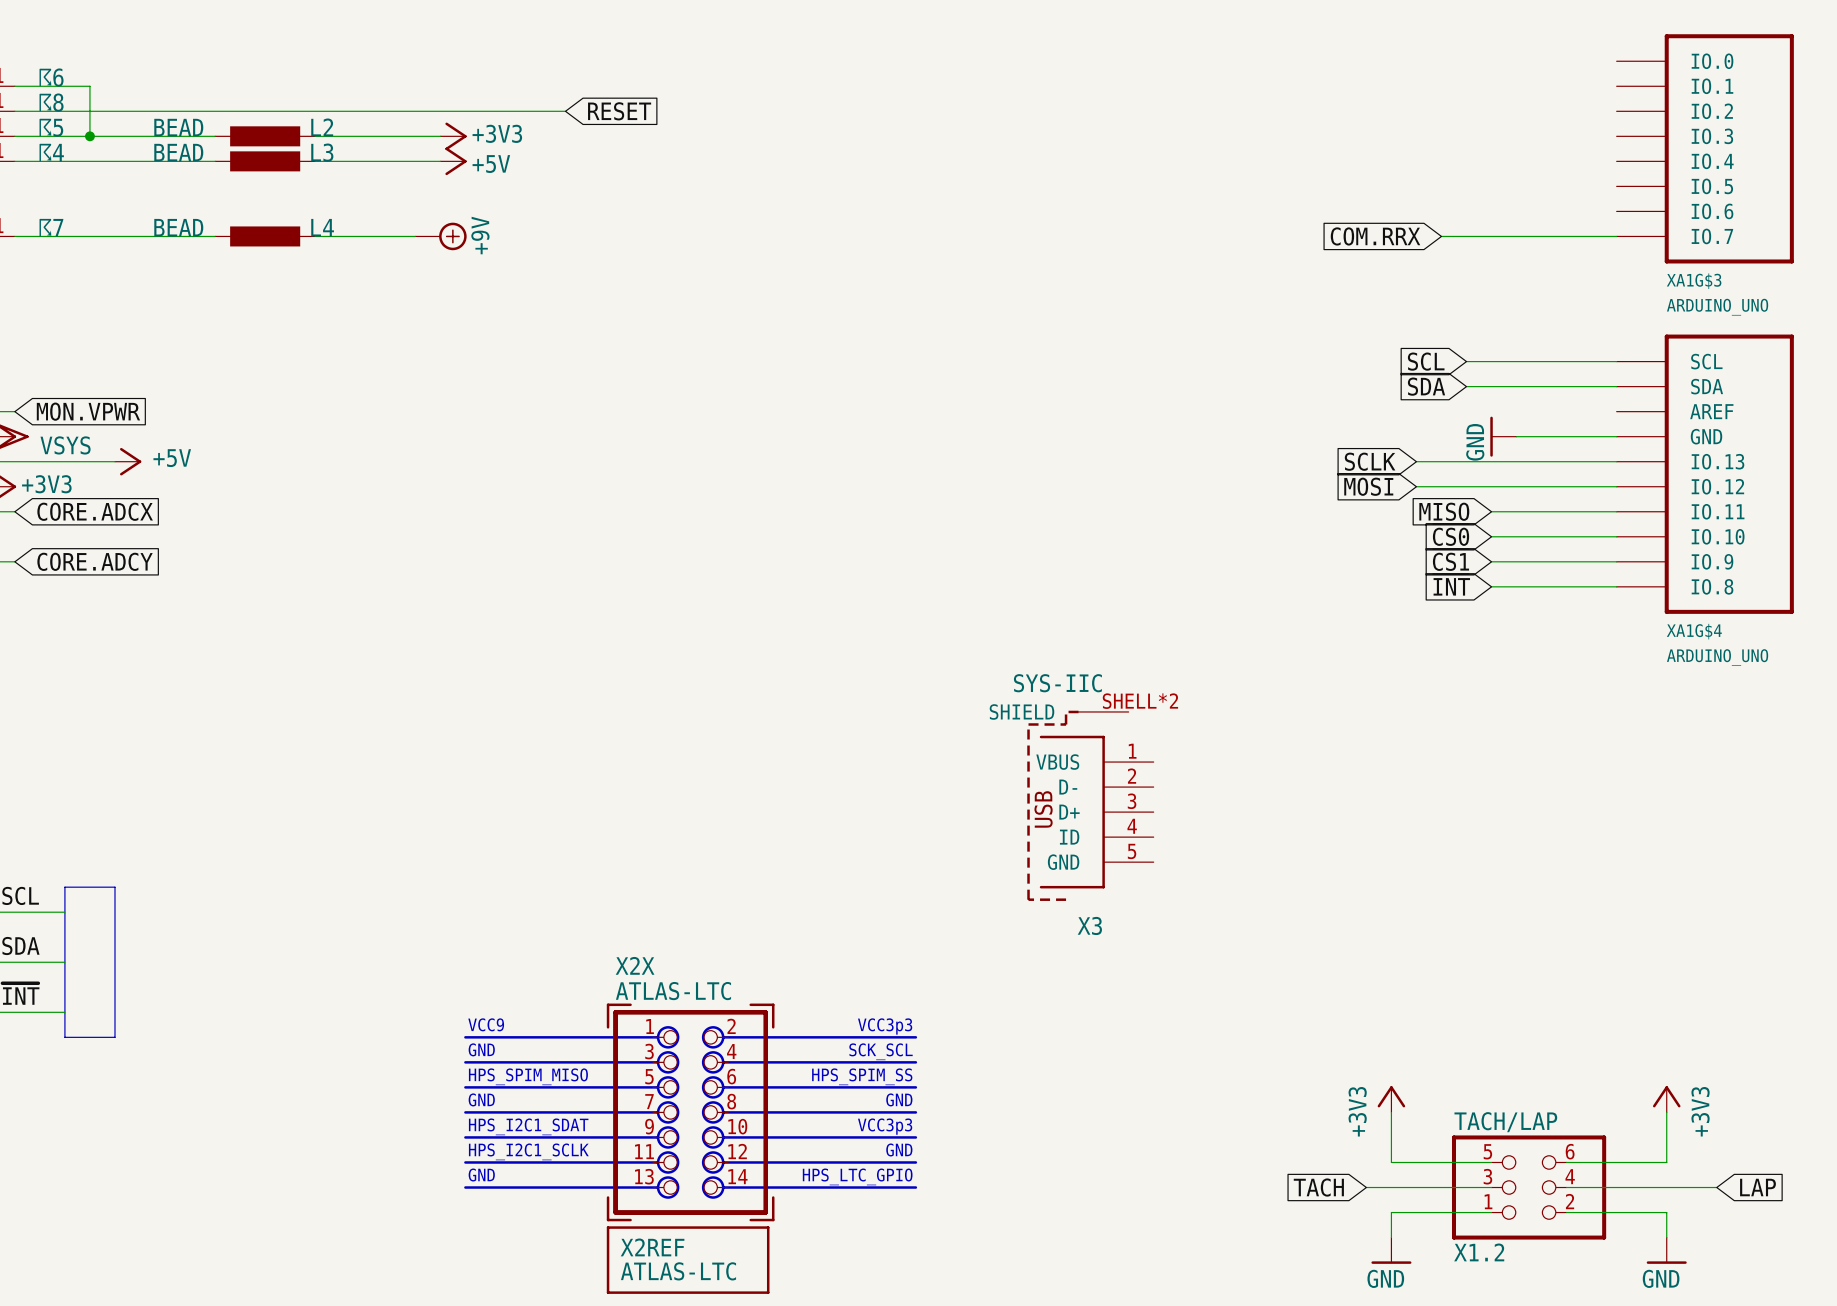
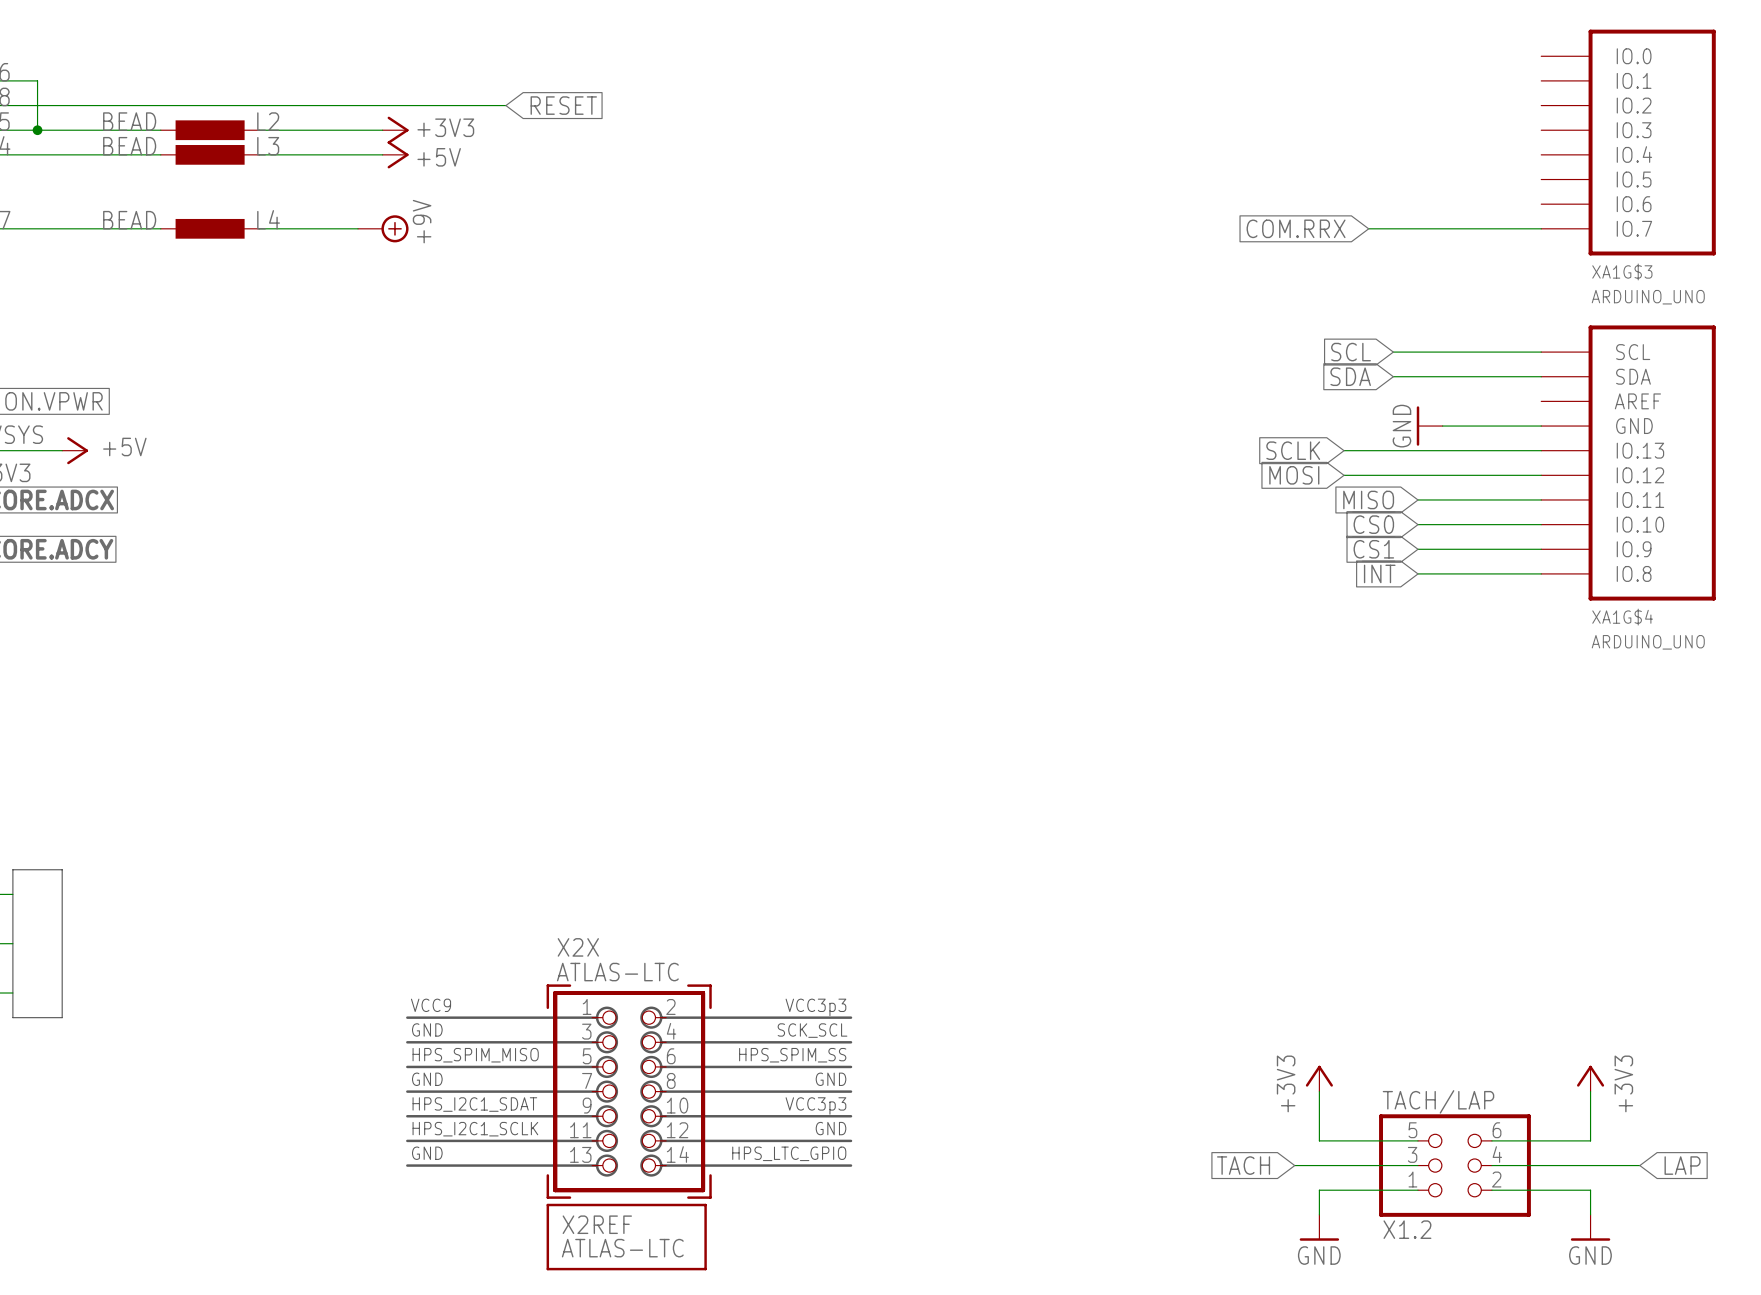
X3: SYS-IIC (1090, 805) -> none

